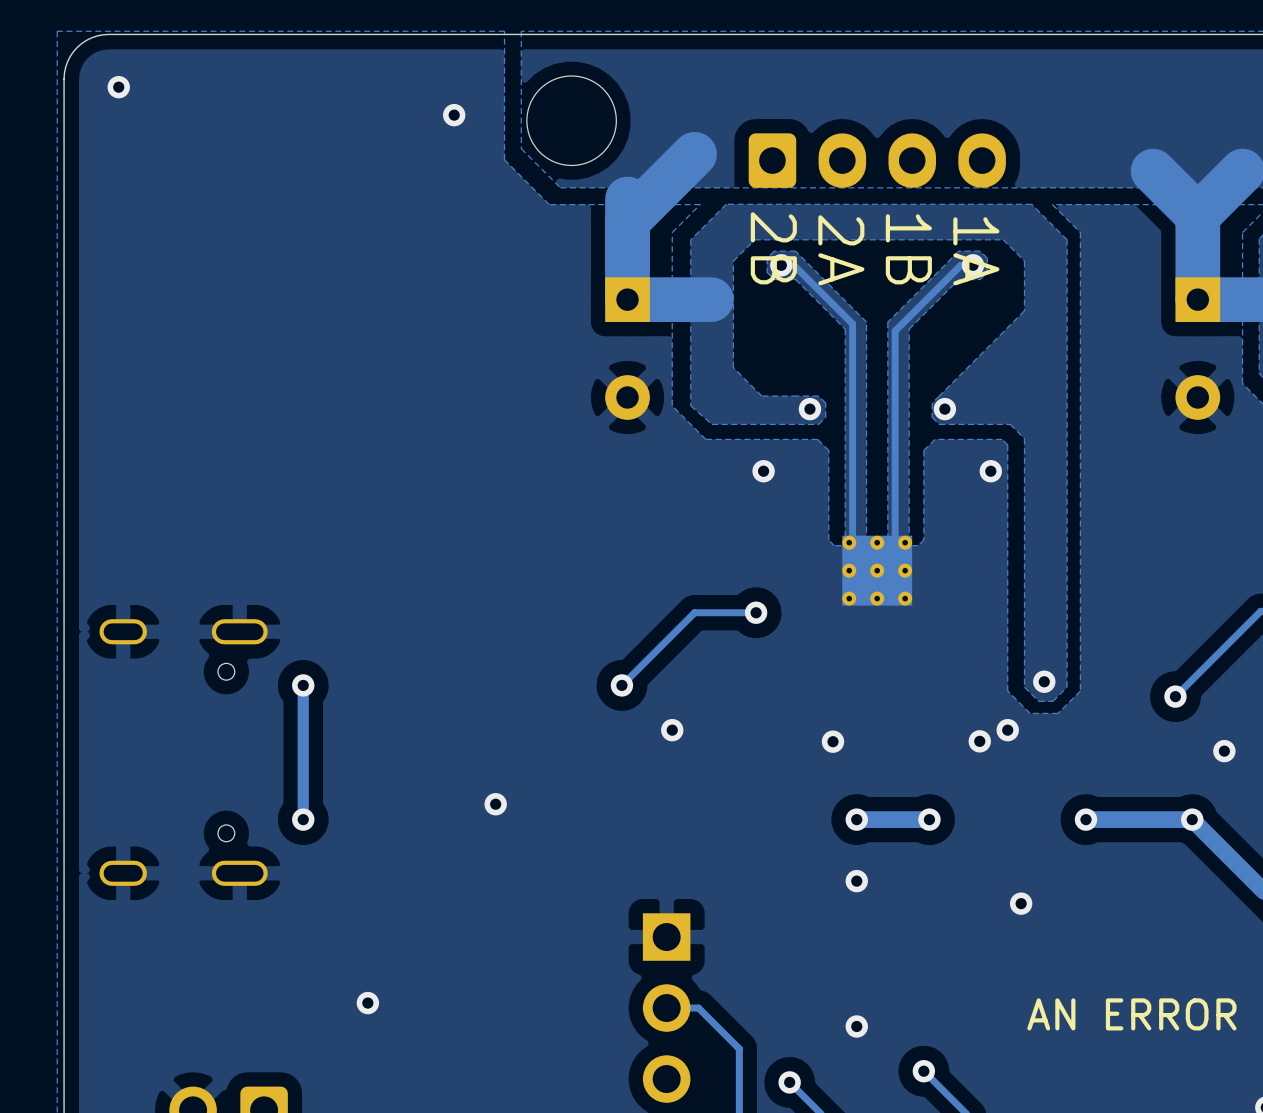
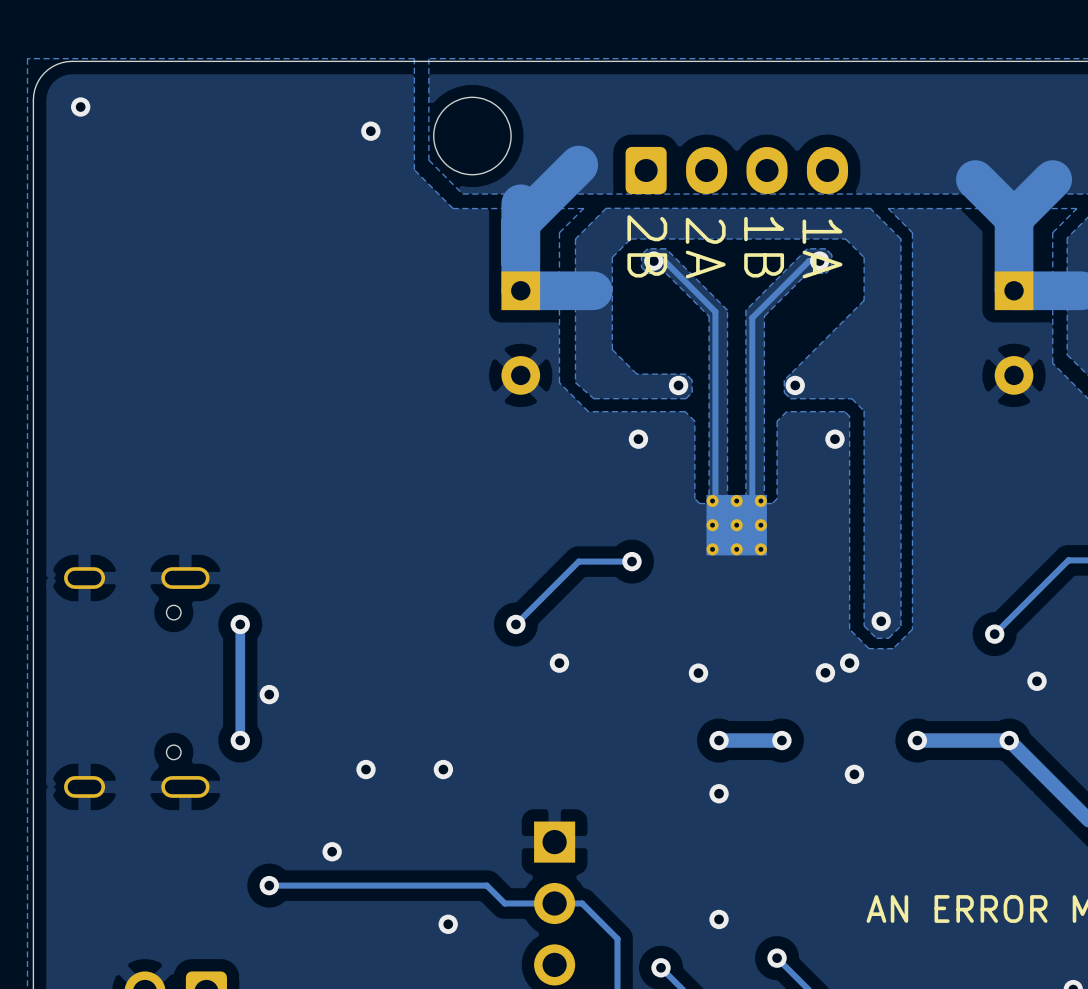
via: none -> (269, 694)
via: (495, 804) -> none
via: none -> (366, 769)
via: none -> (443, 769)
via position: (1021, 903) -> (854, 774)
via: none -> (332, 851)
track: none -> (269, 885) (486, 885) (504, 903) (554, 903)
via: none -> (269, 885)
via: (367, 1003) -> none
via: none -> (448, 924)

